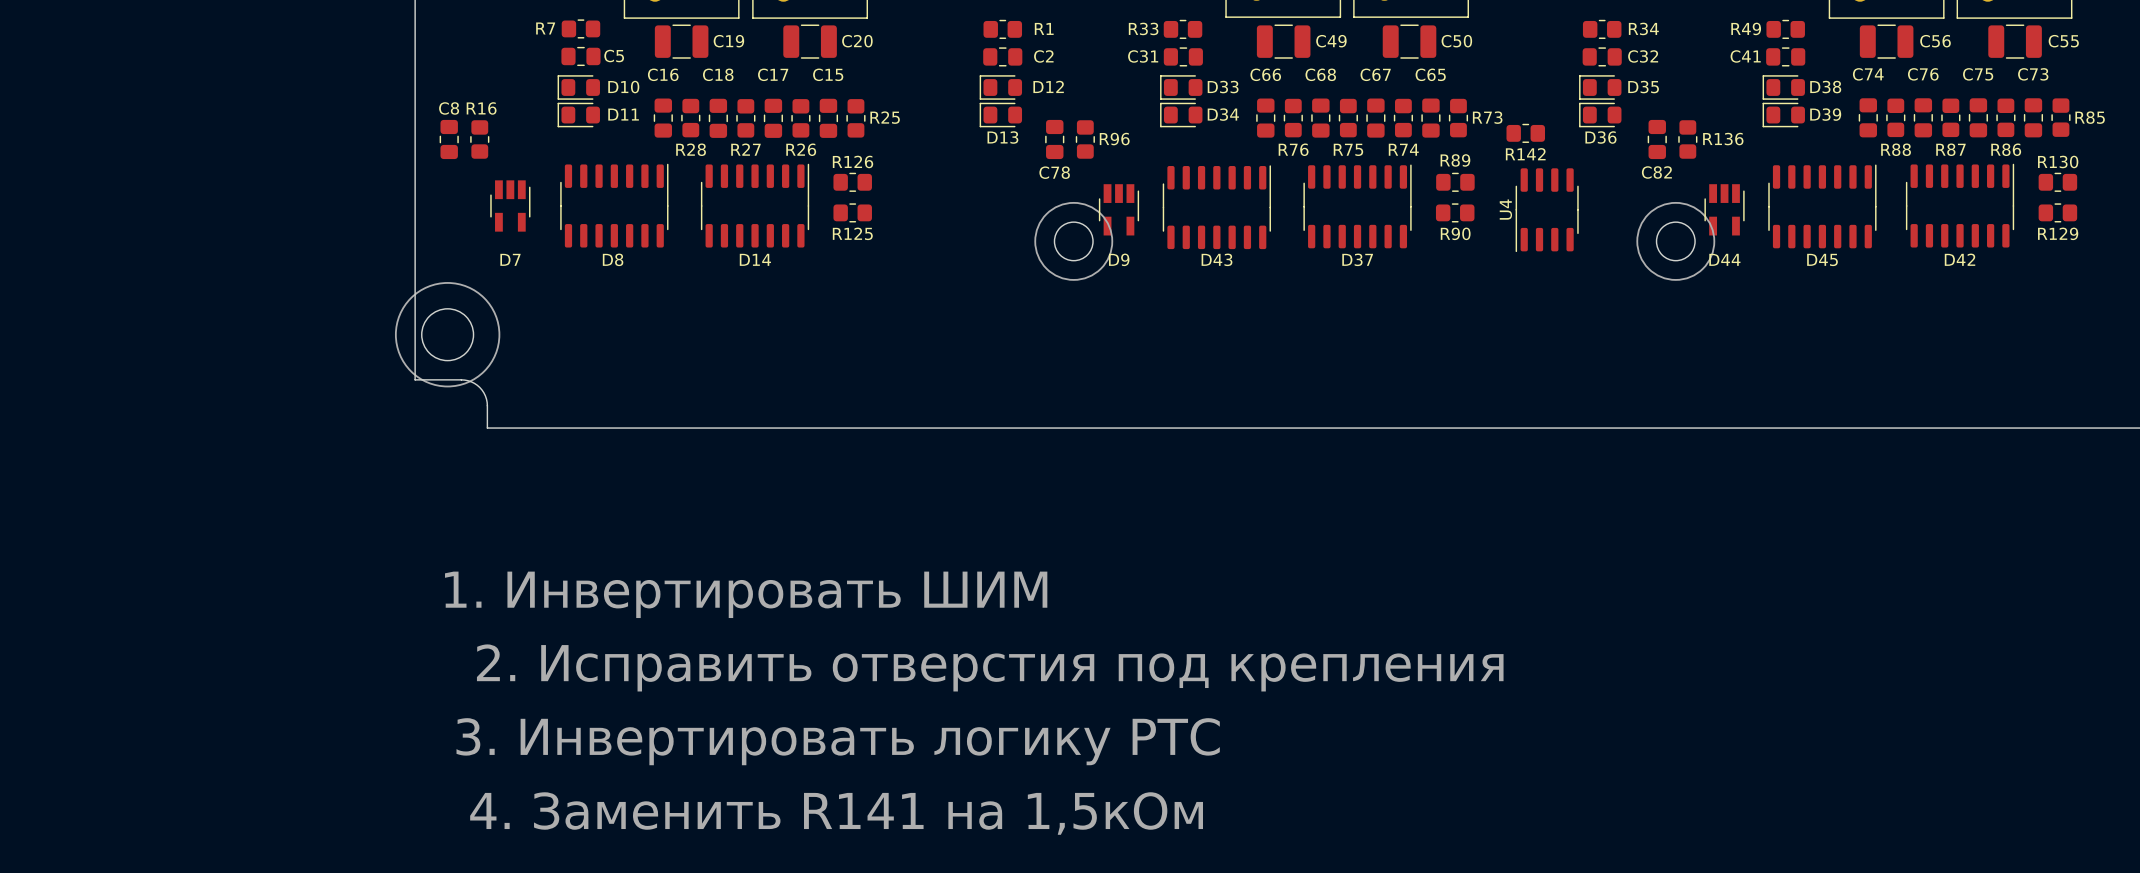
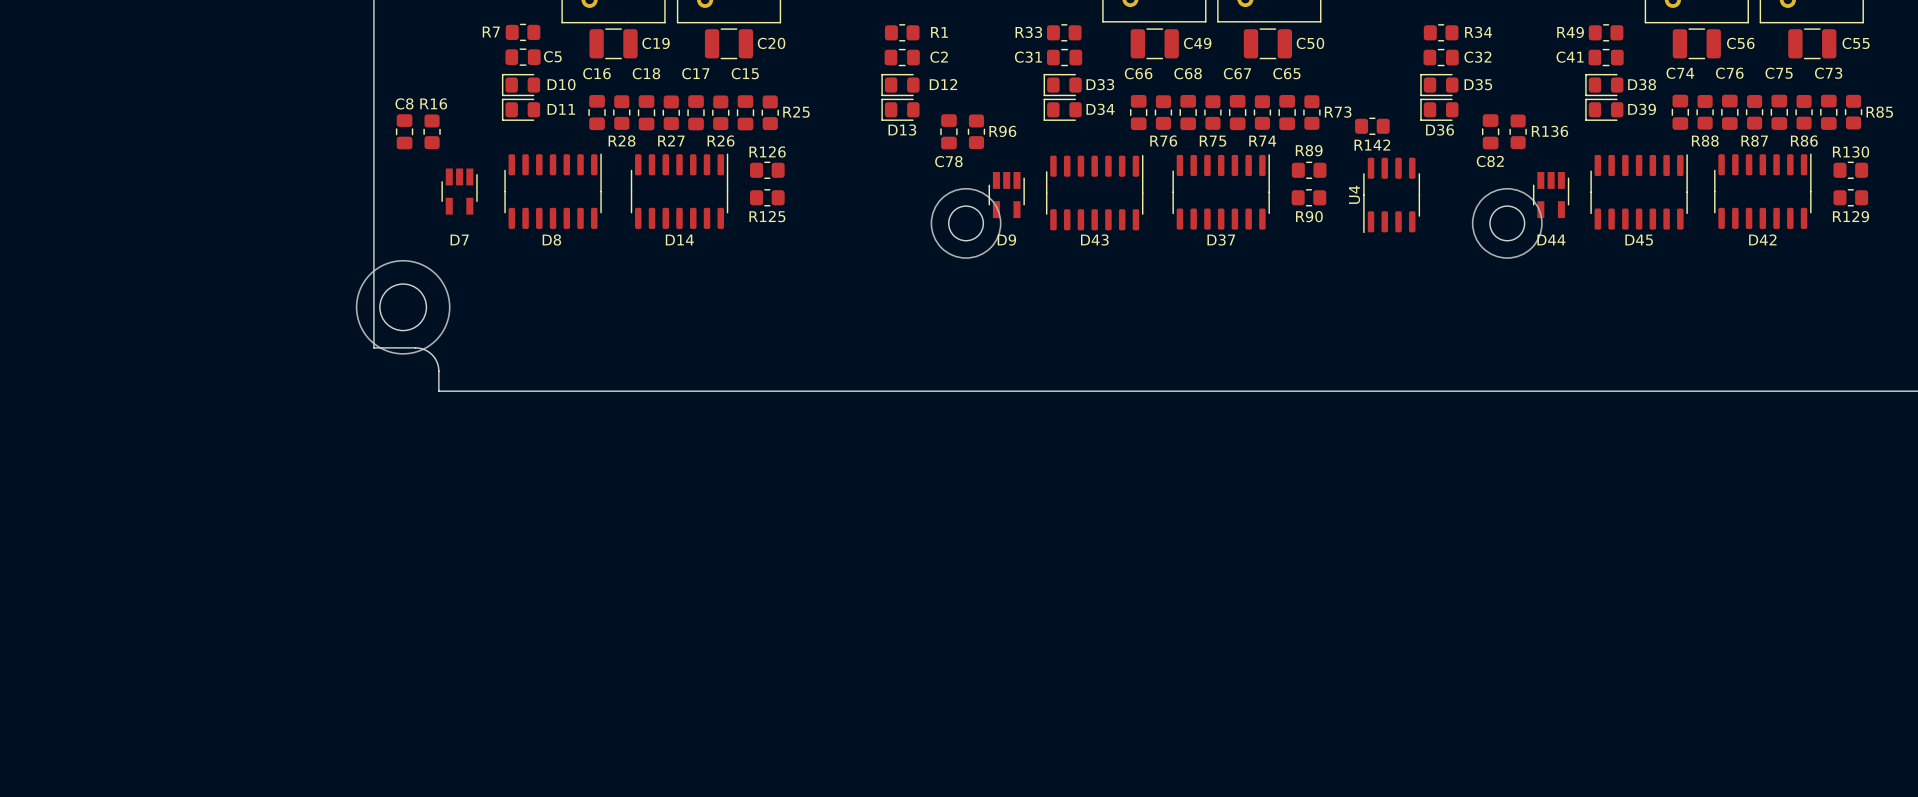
text: 1. Инвертировать ШИМ (746, 594) -> none
text: 2. Исправить отверстия под крепления (990, 667) -> none
text: 3. Инвертировать логику PTC (838, 741) -> none
text: 4. Заменить R141 на 1,5кОм (836, 813) -> none

